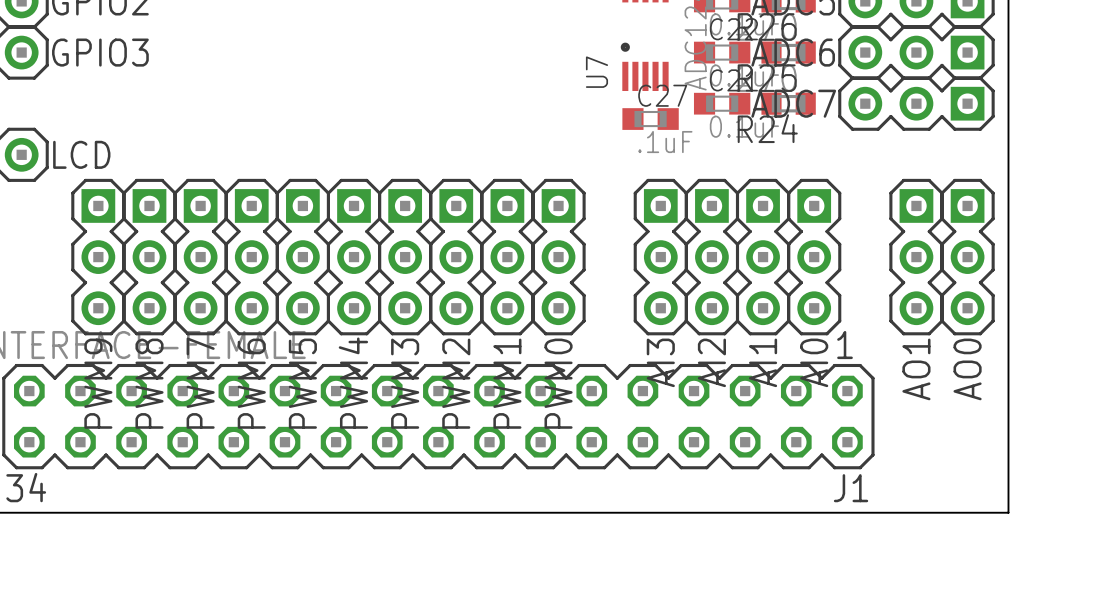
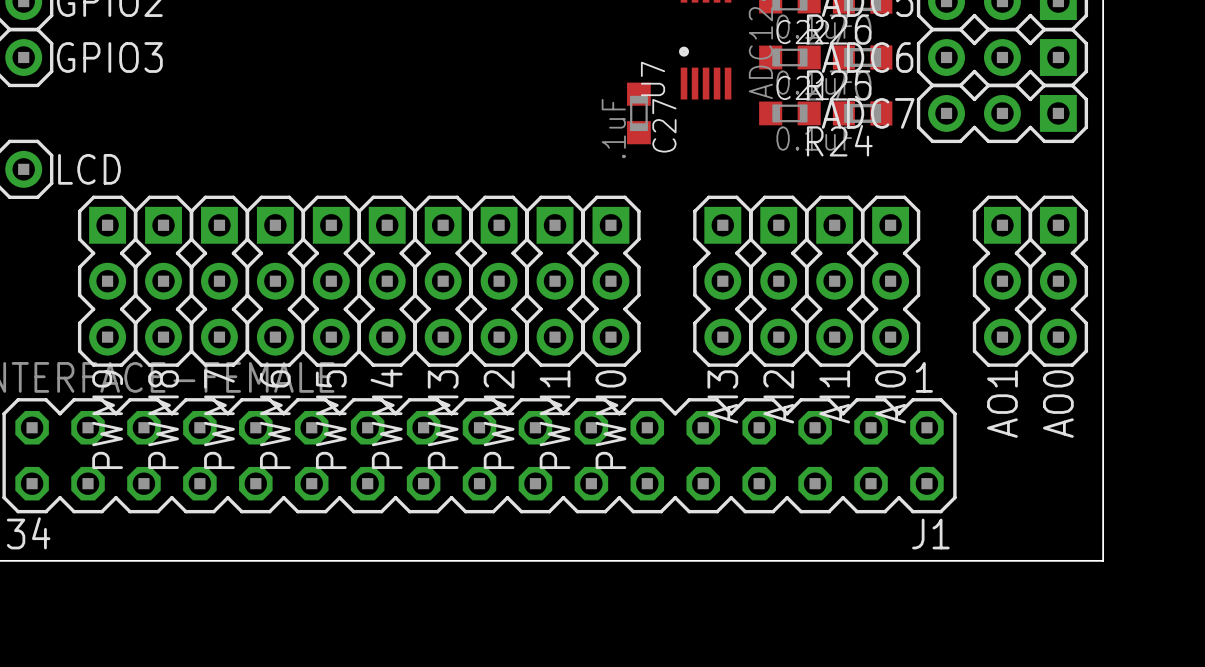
C27 rotation: 0° (650, 119) -> 90° clockwise (638, 113)
C27 position: (650, 119) -> (638, 113)

